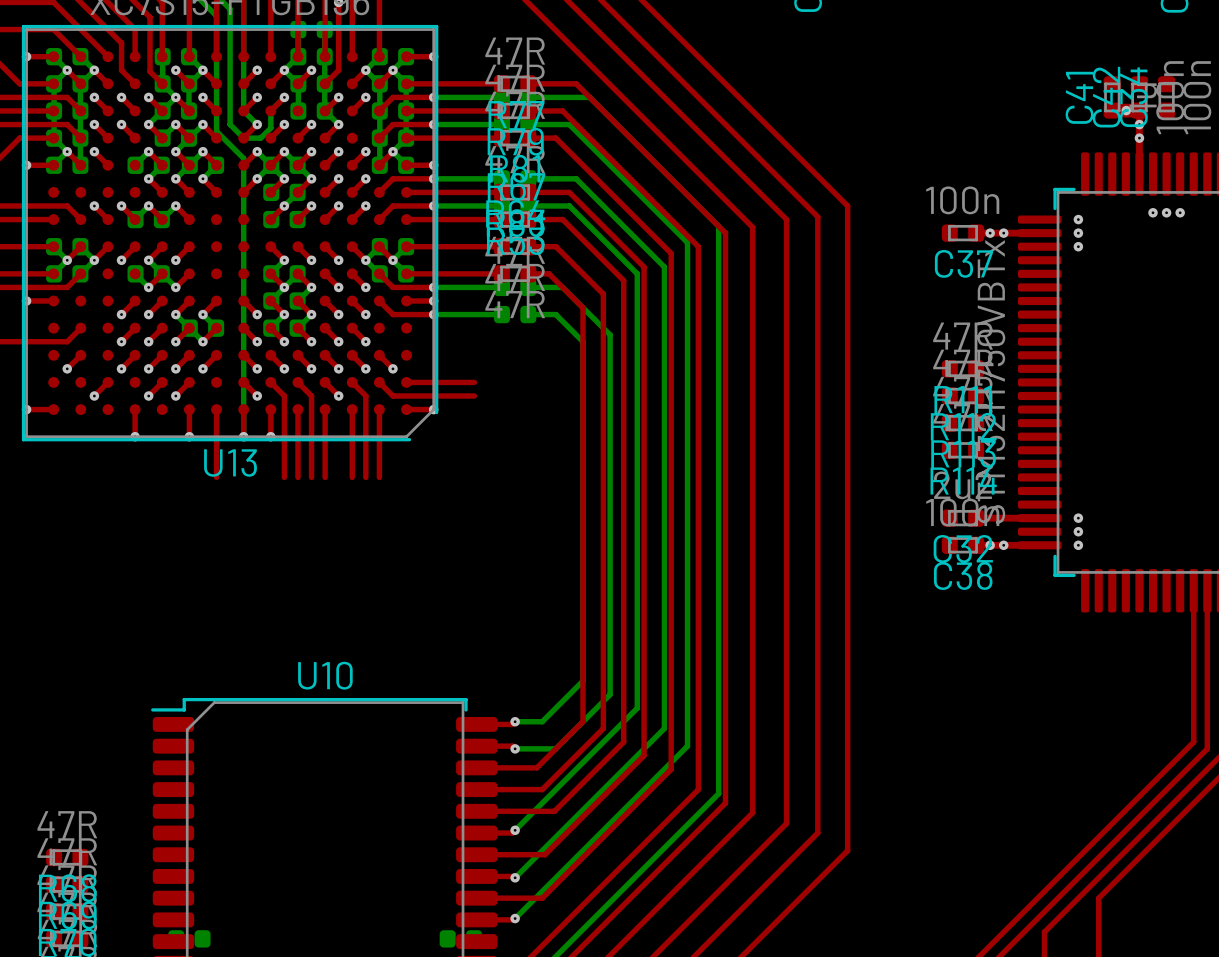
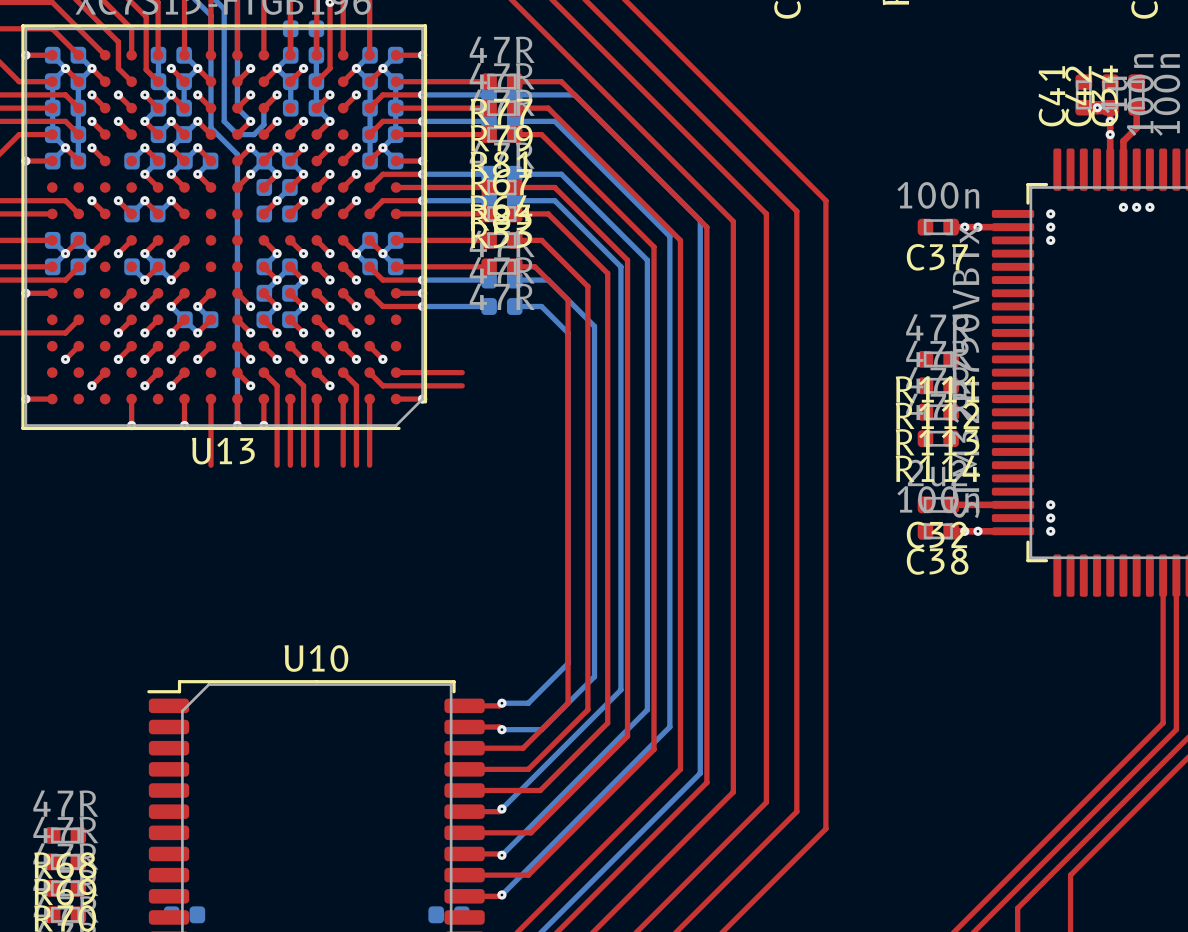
top track: none -> (1136, 107) (1136, 127) (1123, 141) (1123, 169)

